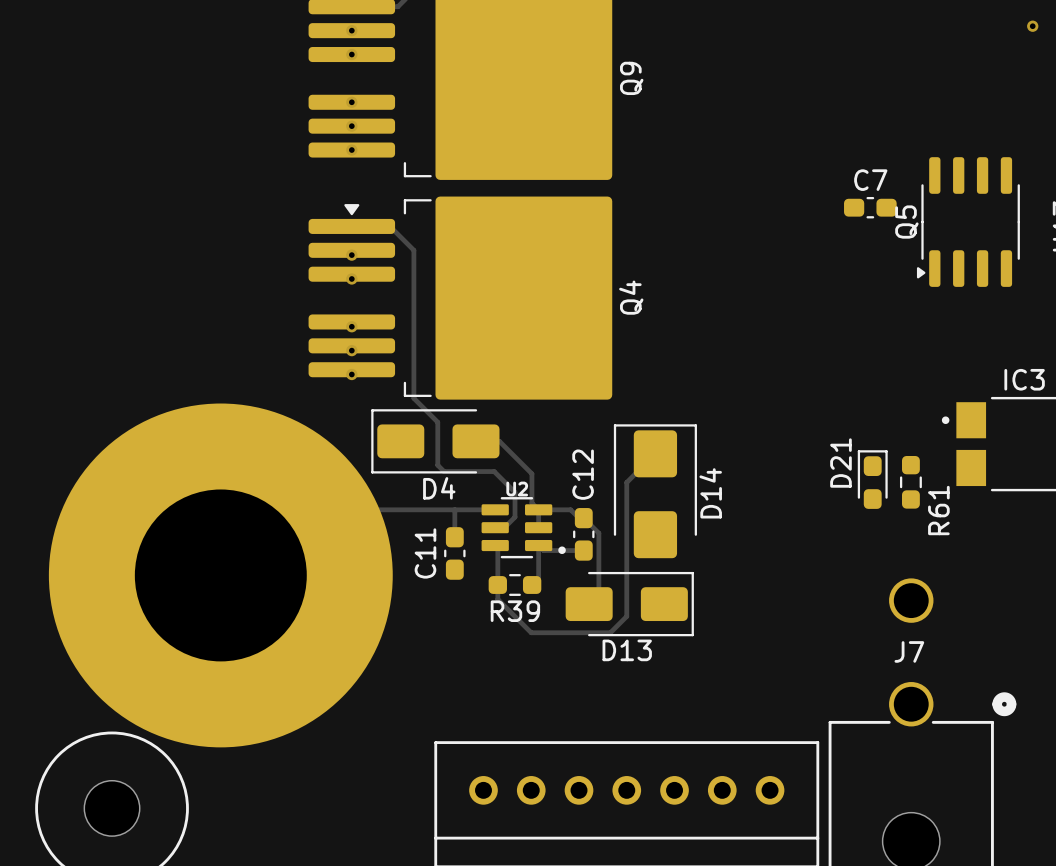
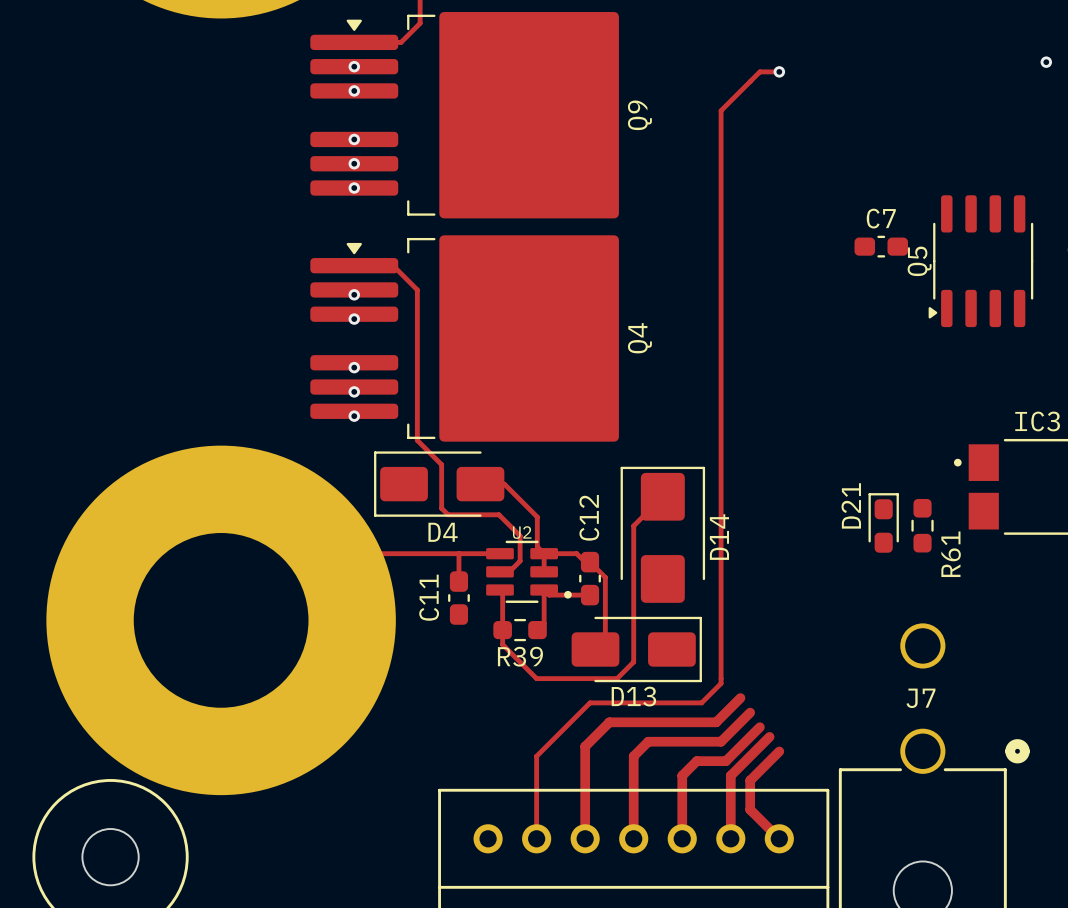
track: none -> (779, 71) (759, 71) (721, 110) (721, 683) (701, 702) (590, 702) (536, 756) (536, 838)
via: none -> (779, 71)
track: none -> (740, 698) (716, 722) (609, 722) (585, 746) (585, 838)
track: none -> (750, 712) (721, 741) (648, 741) (633, 756) (633, 838)
track: none -> (759, 727) (725, 761) (696, 761) (682, 775) (682, 838)
track: none -> (769, 736) (730, 775) (730, 838)
track: none -> (779, 751) (750, 780) (750, 809) (779, 838)

